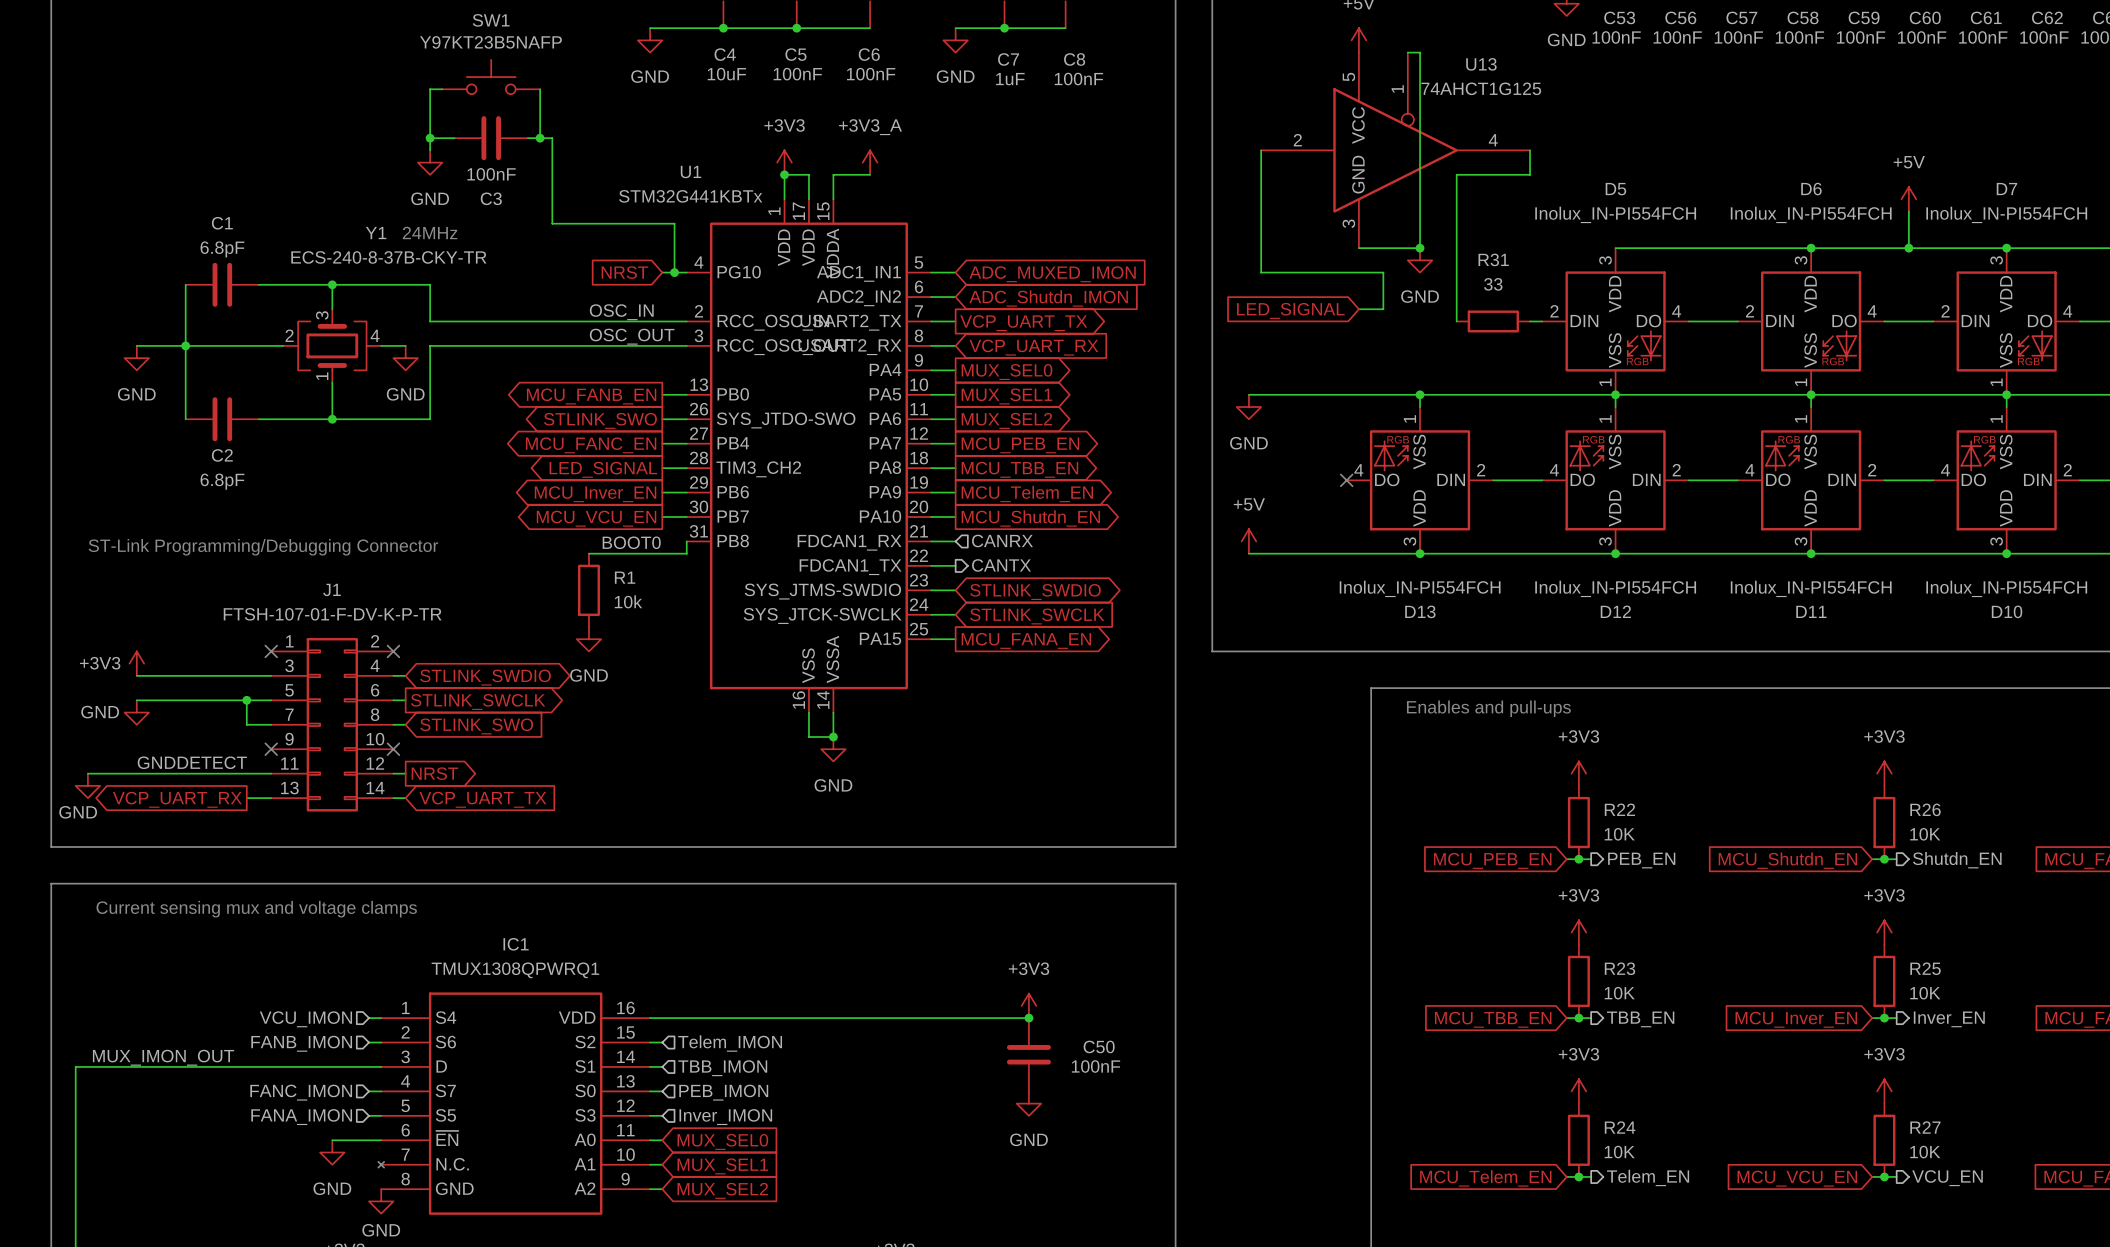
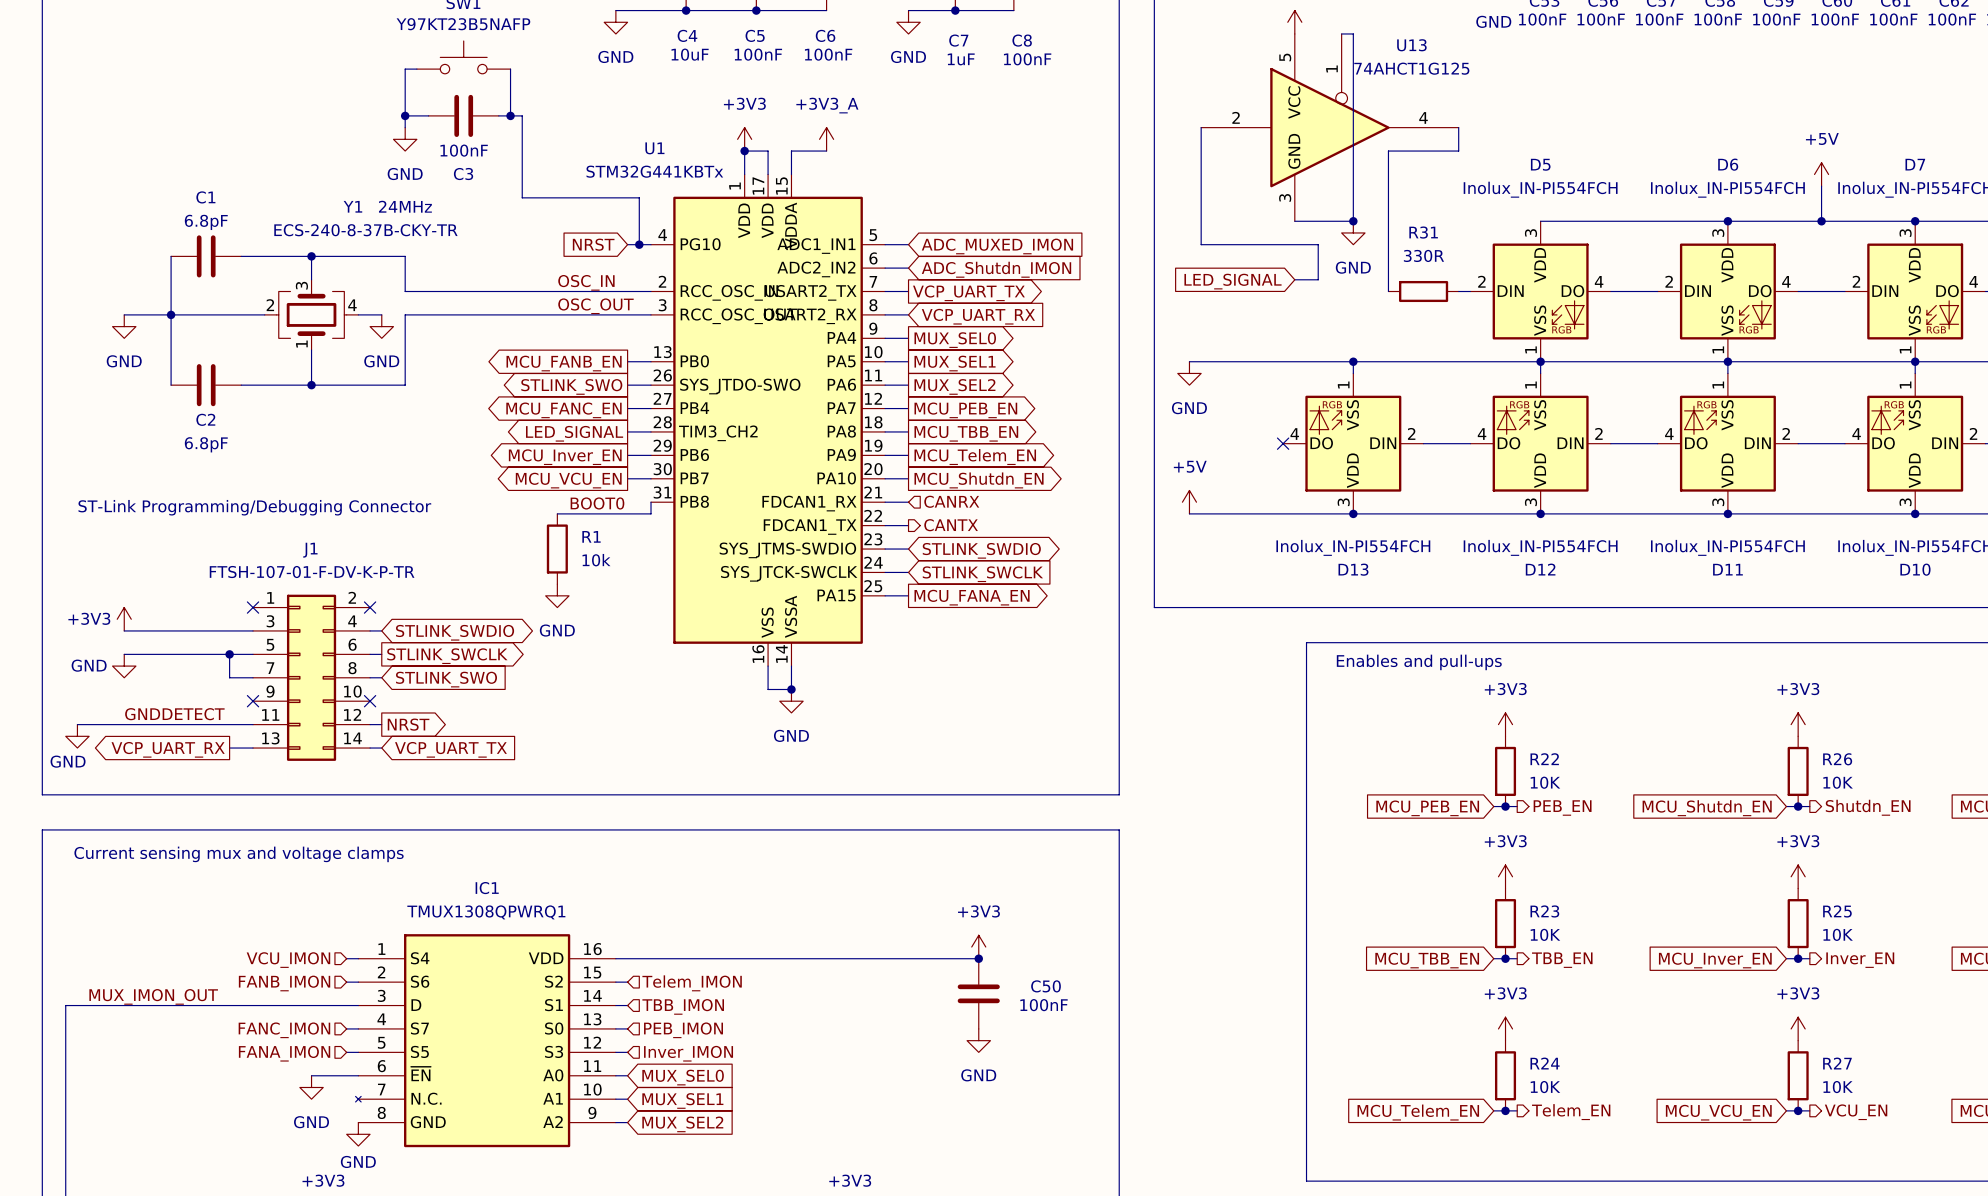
R31 value: 33 (1493, 284) -> 330R (1423, 255)

